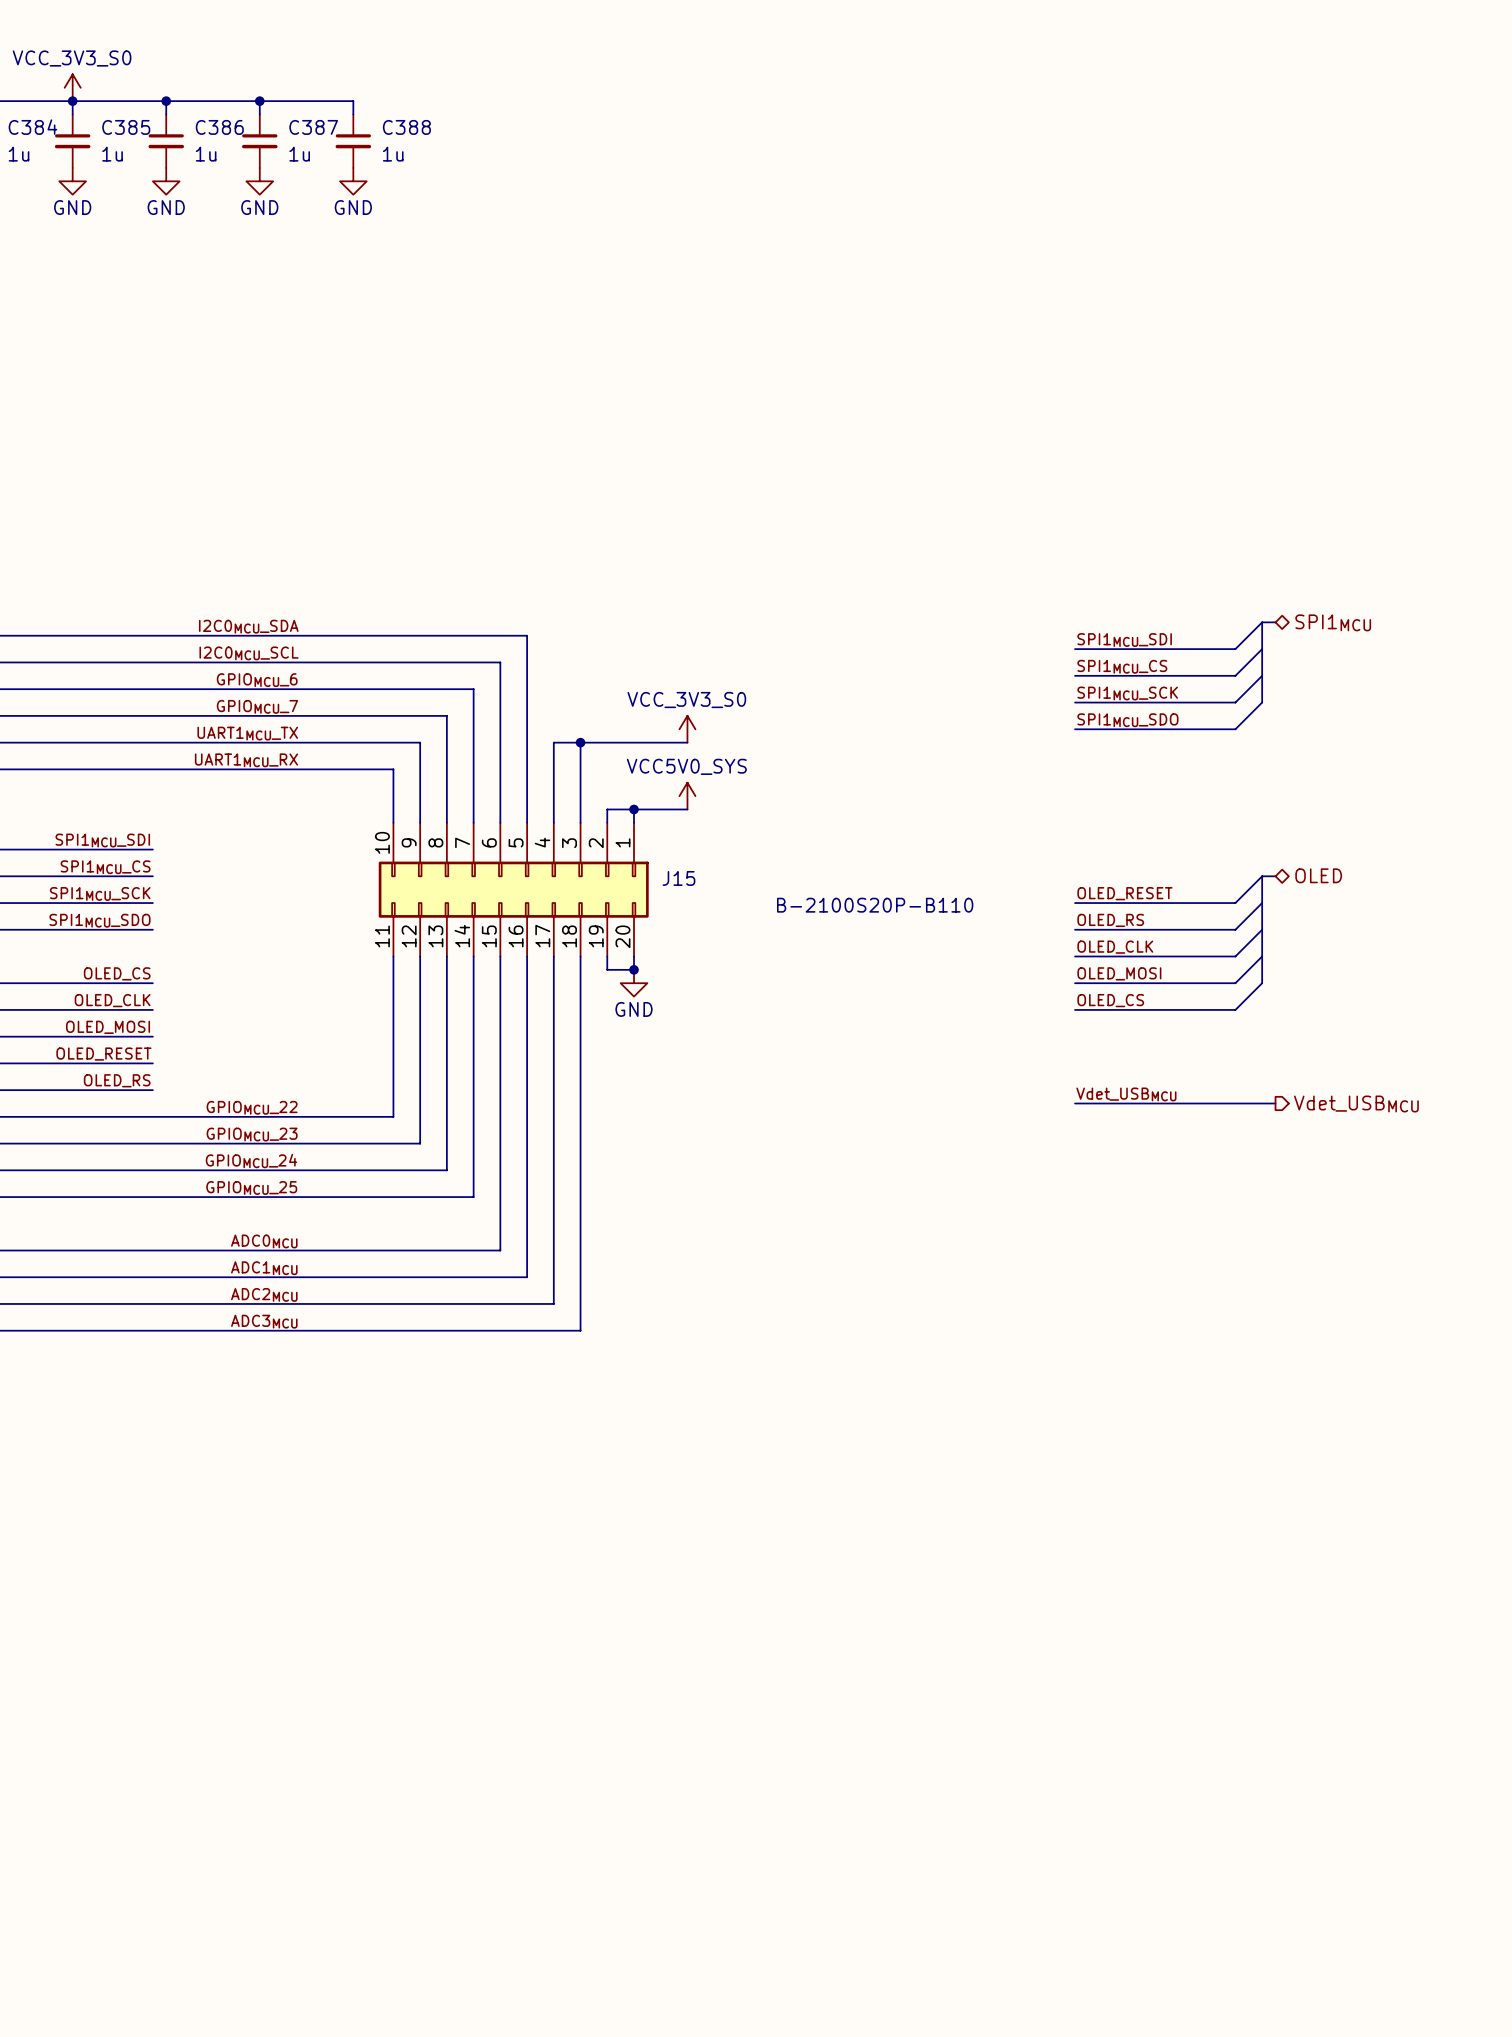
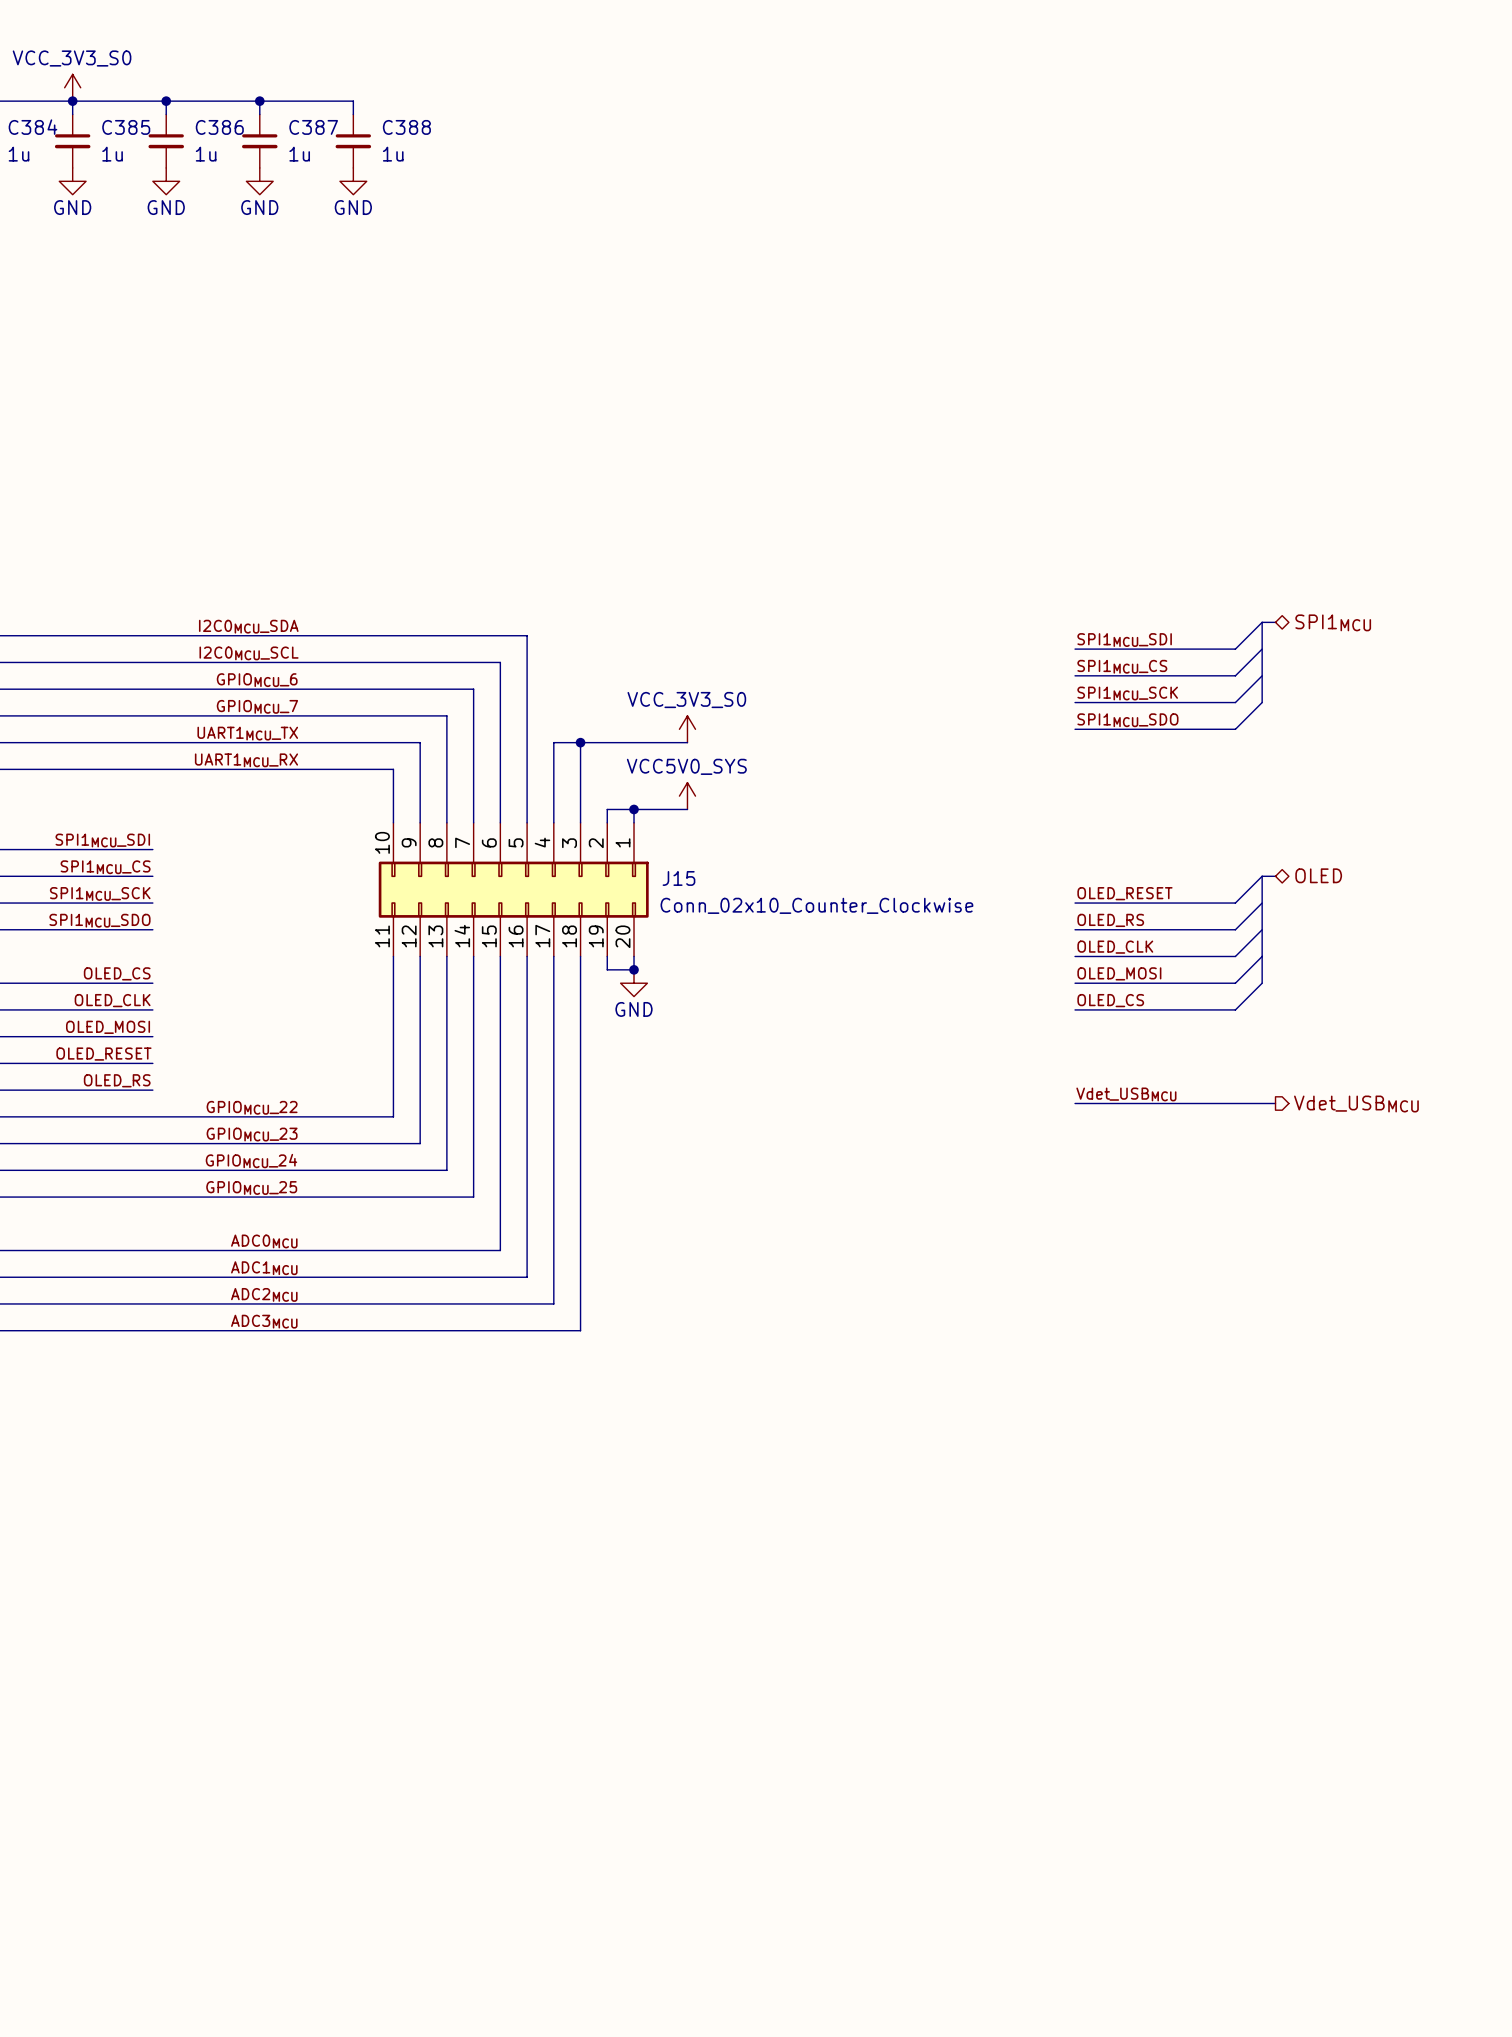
J15 value: B-2100S20P-B110 (875, 905) -> Conn_02x10_Counter_Clockwise (816, 905)

